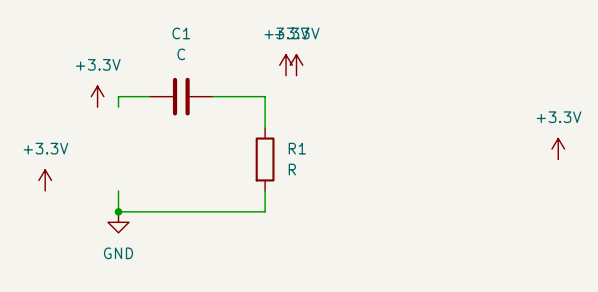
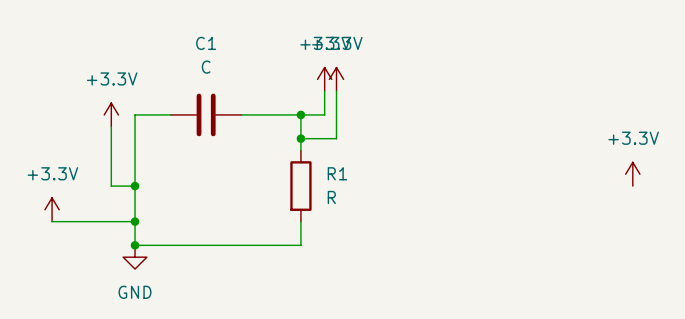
wire: none -> (324, 91) (324, 114) (300, 114)
wire: none -> (336, 91) (336, 138) (300, 138)
junction: none -> (300, 114)
wire: none -> (111, 126) (111, 186) (135, 186)
wire: none -> (135, 126) (135, 221) (52, 221)
junction: none -> (300, 138)
junction: none -> (135, 186)
junction: none -> (135, 221)

